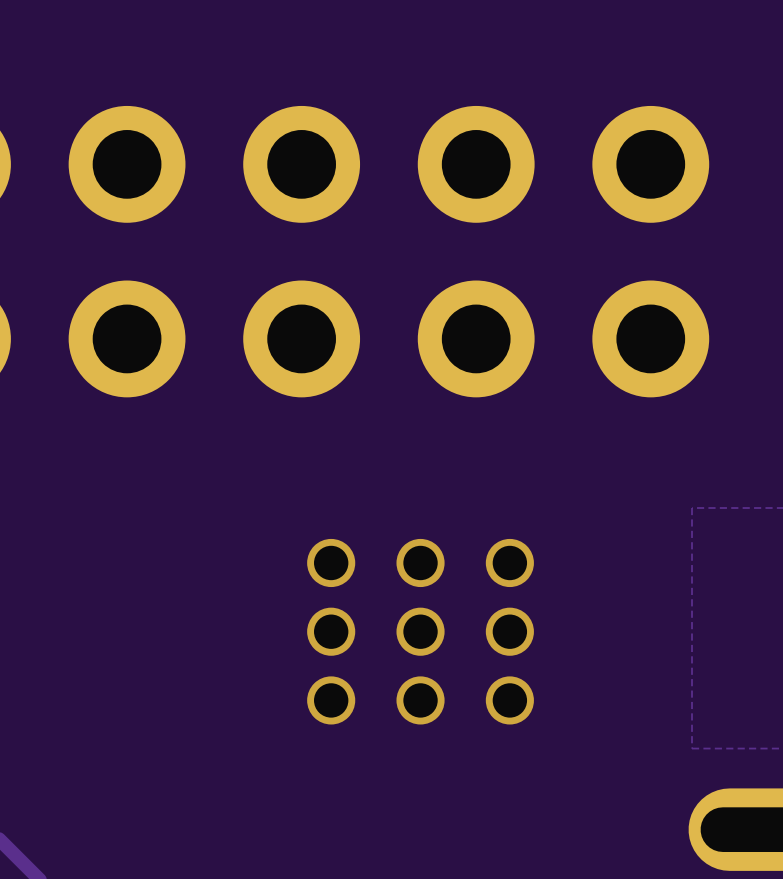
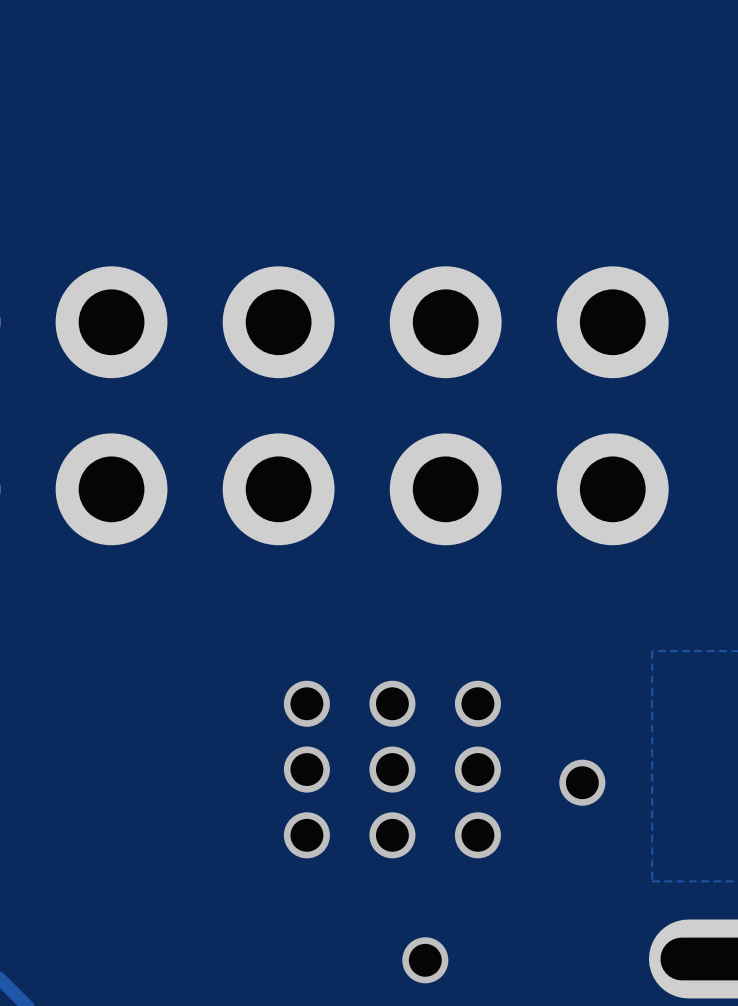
via: none -> (582, 782)
via: none -> (425, 960)

